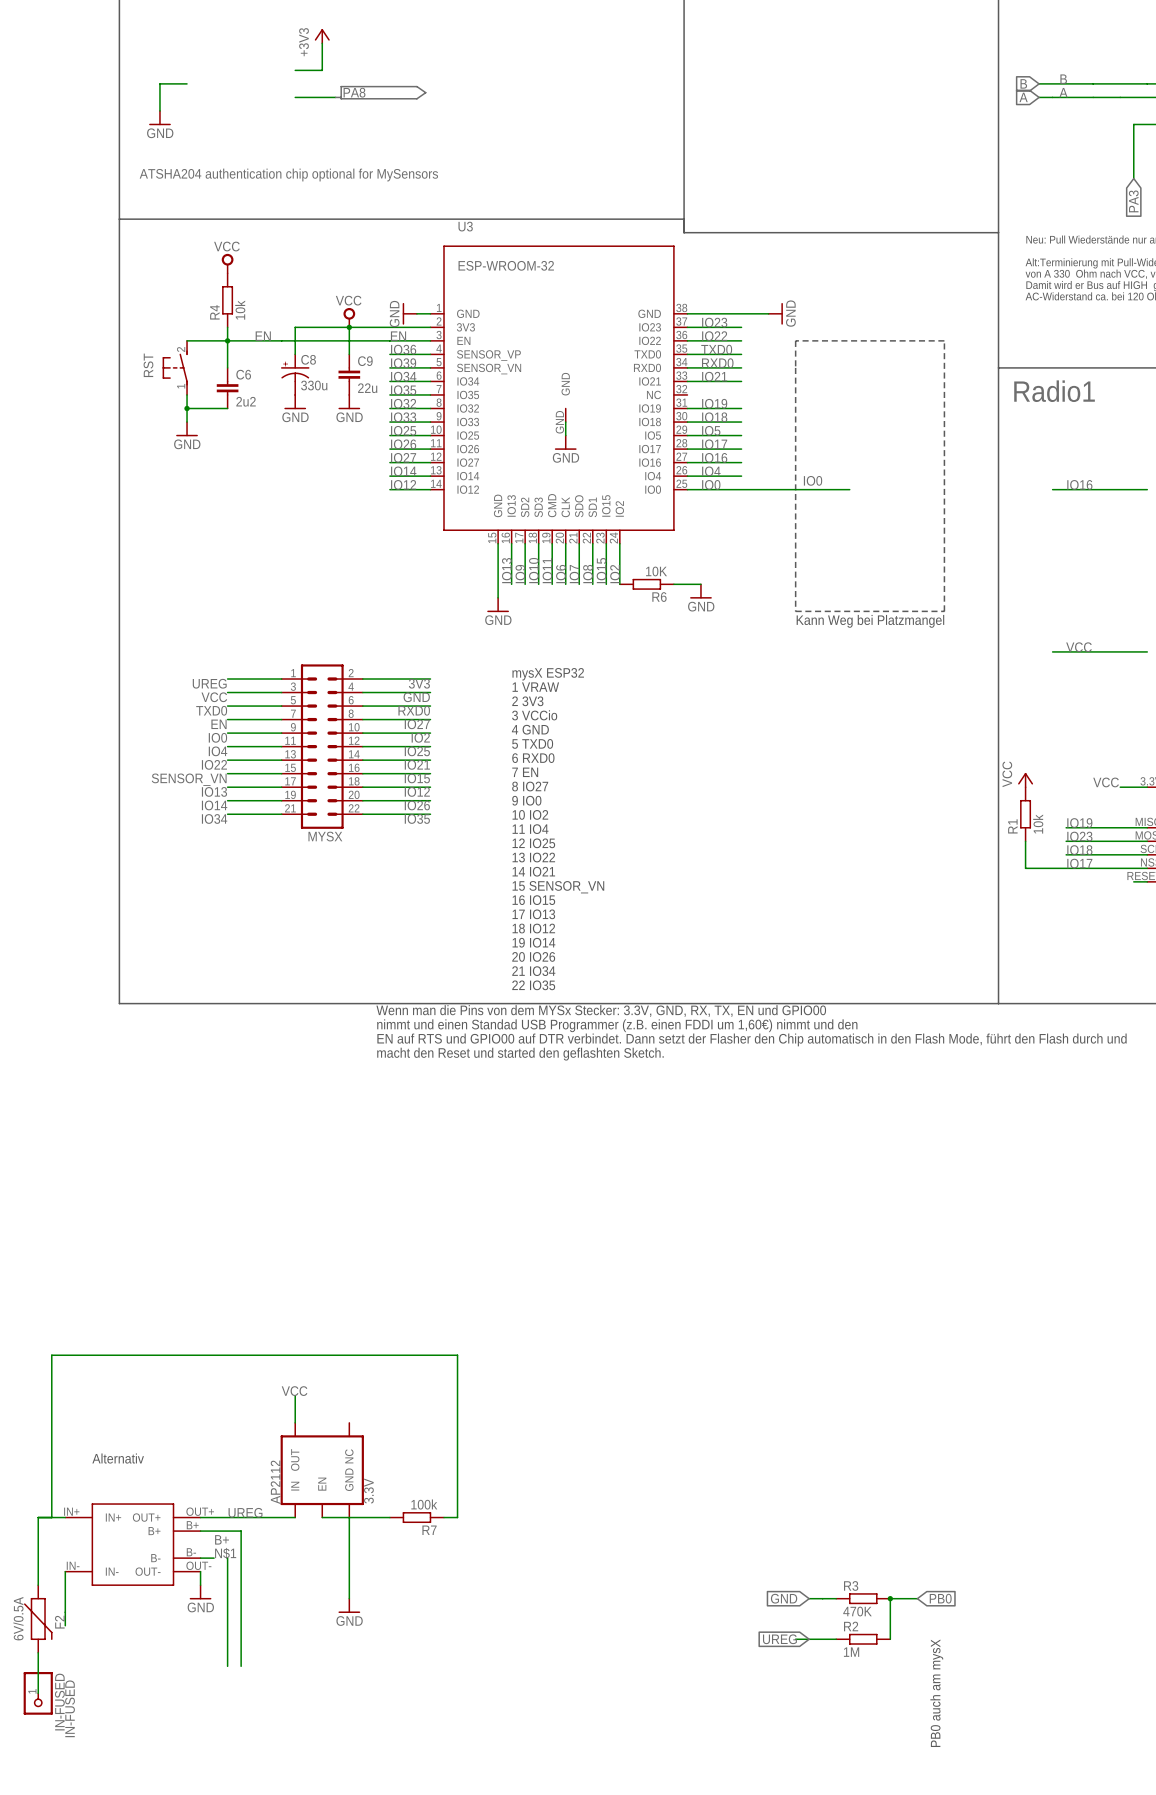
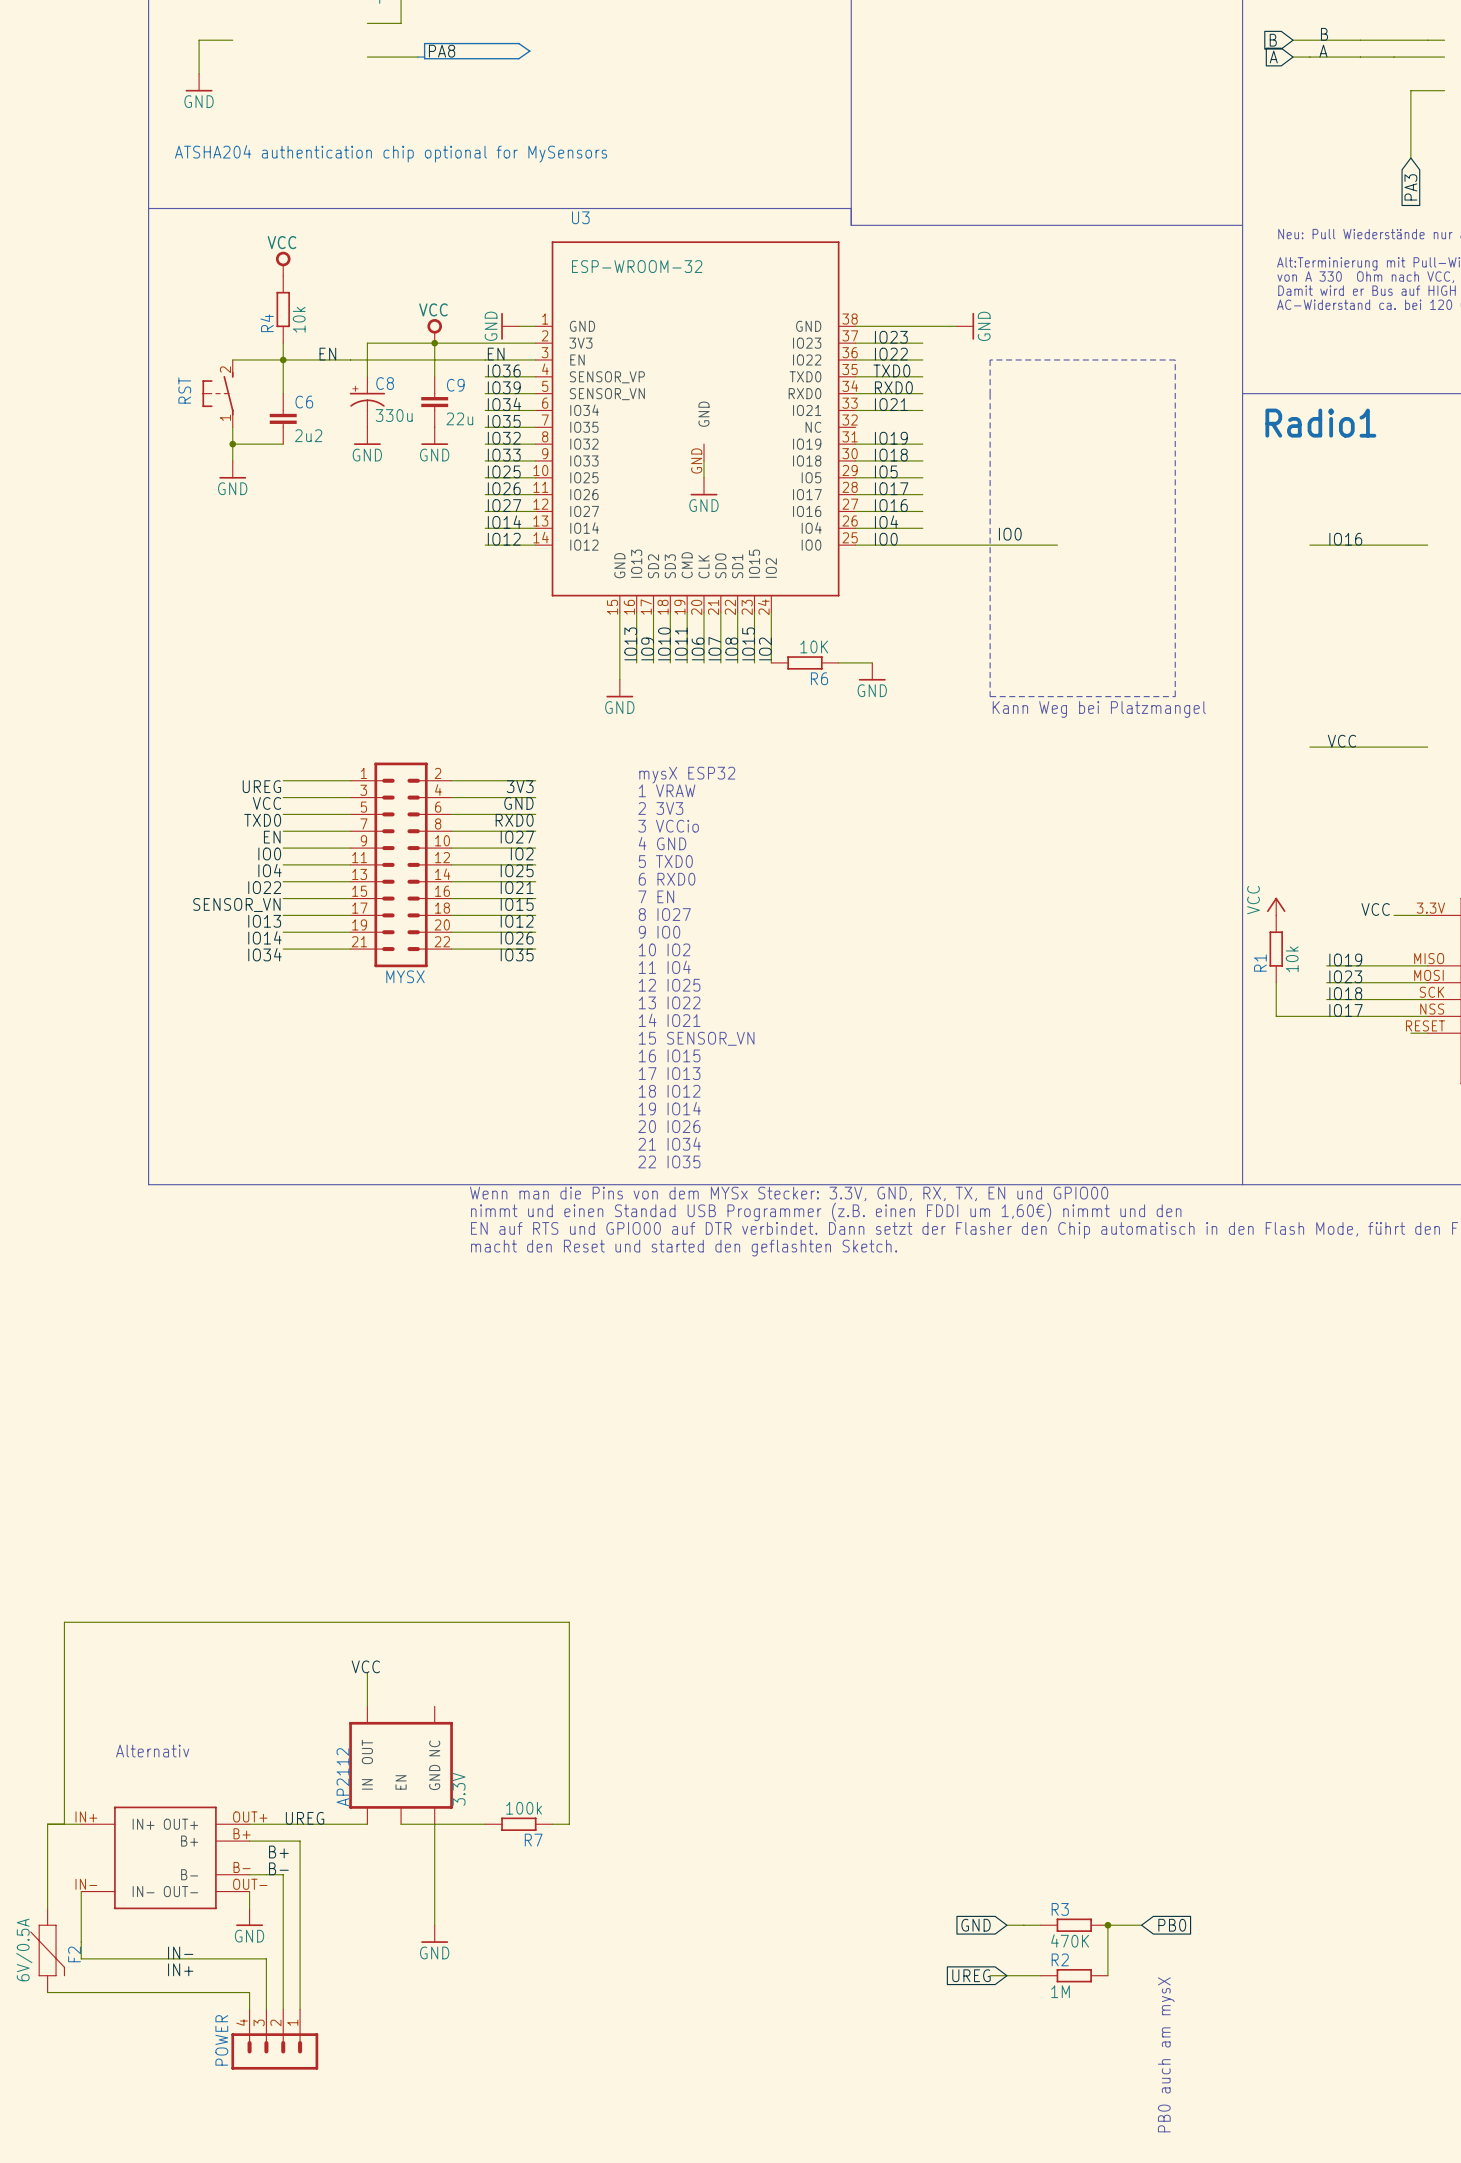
label: N$1 (225, 1553) -> B- (278, 1868)
wire: none -> (266, 1874) (283, 1874)
label: none -> IN- (180, 1952)
wire: none -> (81, 1958) (266, 1958) (266, 2009)
label: none -> IN+ (180, 1969)
wire: (38, 1652) (38, 1693) -> (47, 1992) (249, 1992) (249, 2009)
POWER: none -> (274, 2039)
IN-FUSED: (38, 1693) -> none
label: IN-FUSED (70, 1708) -> none

